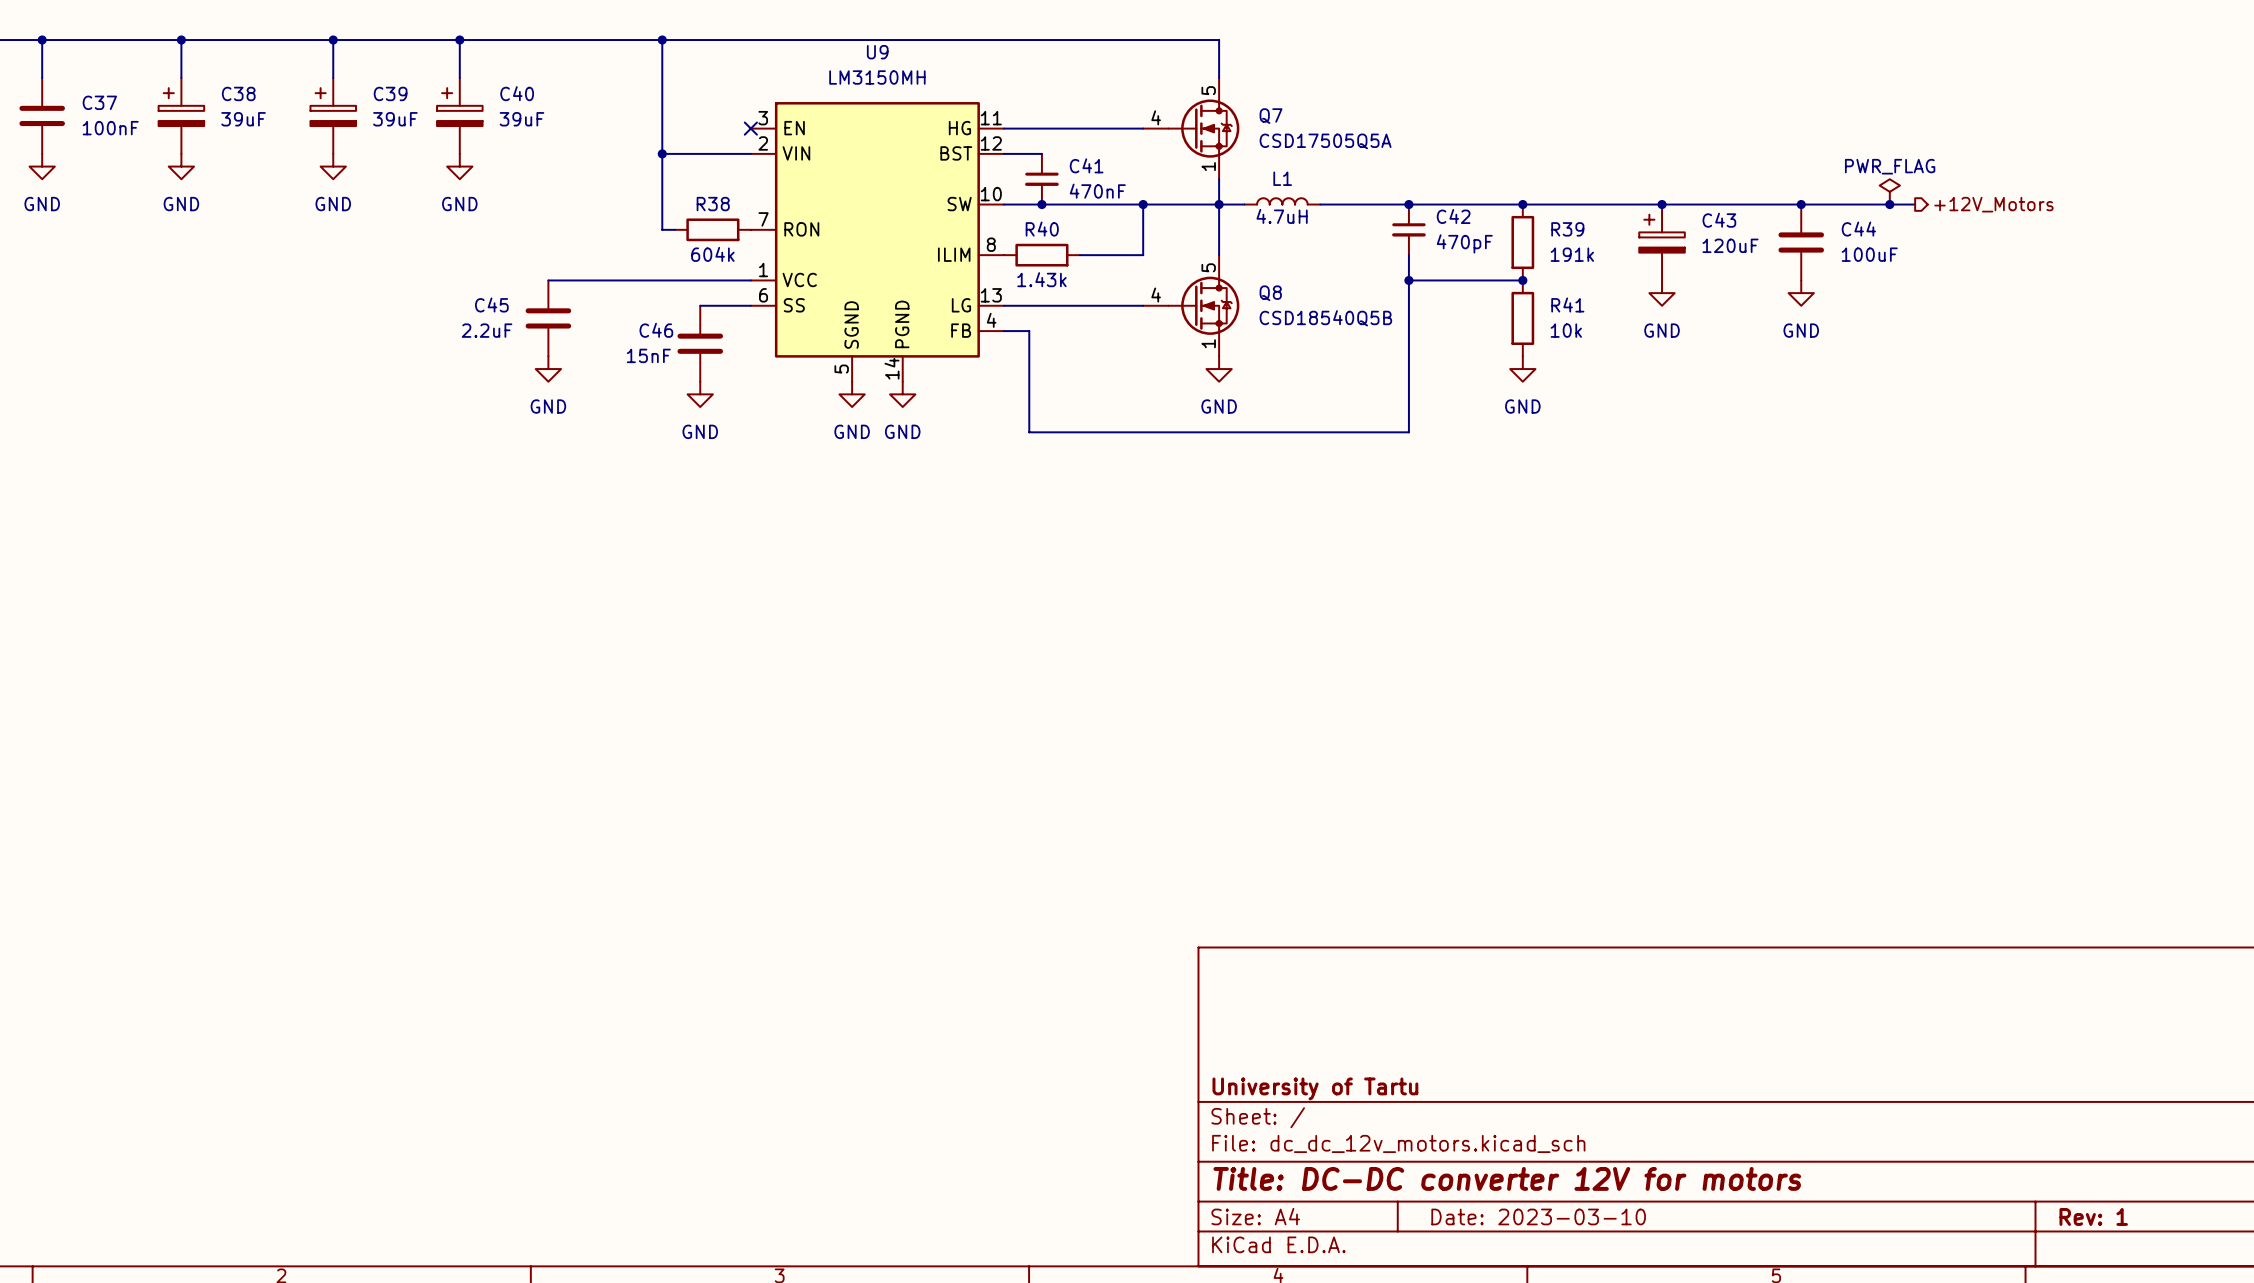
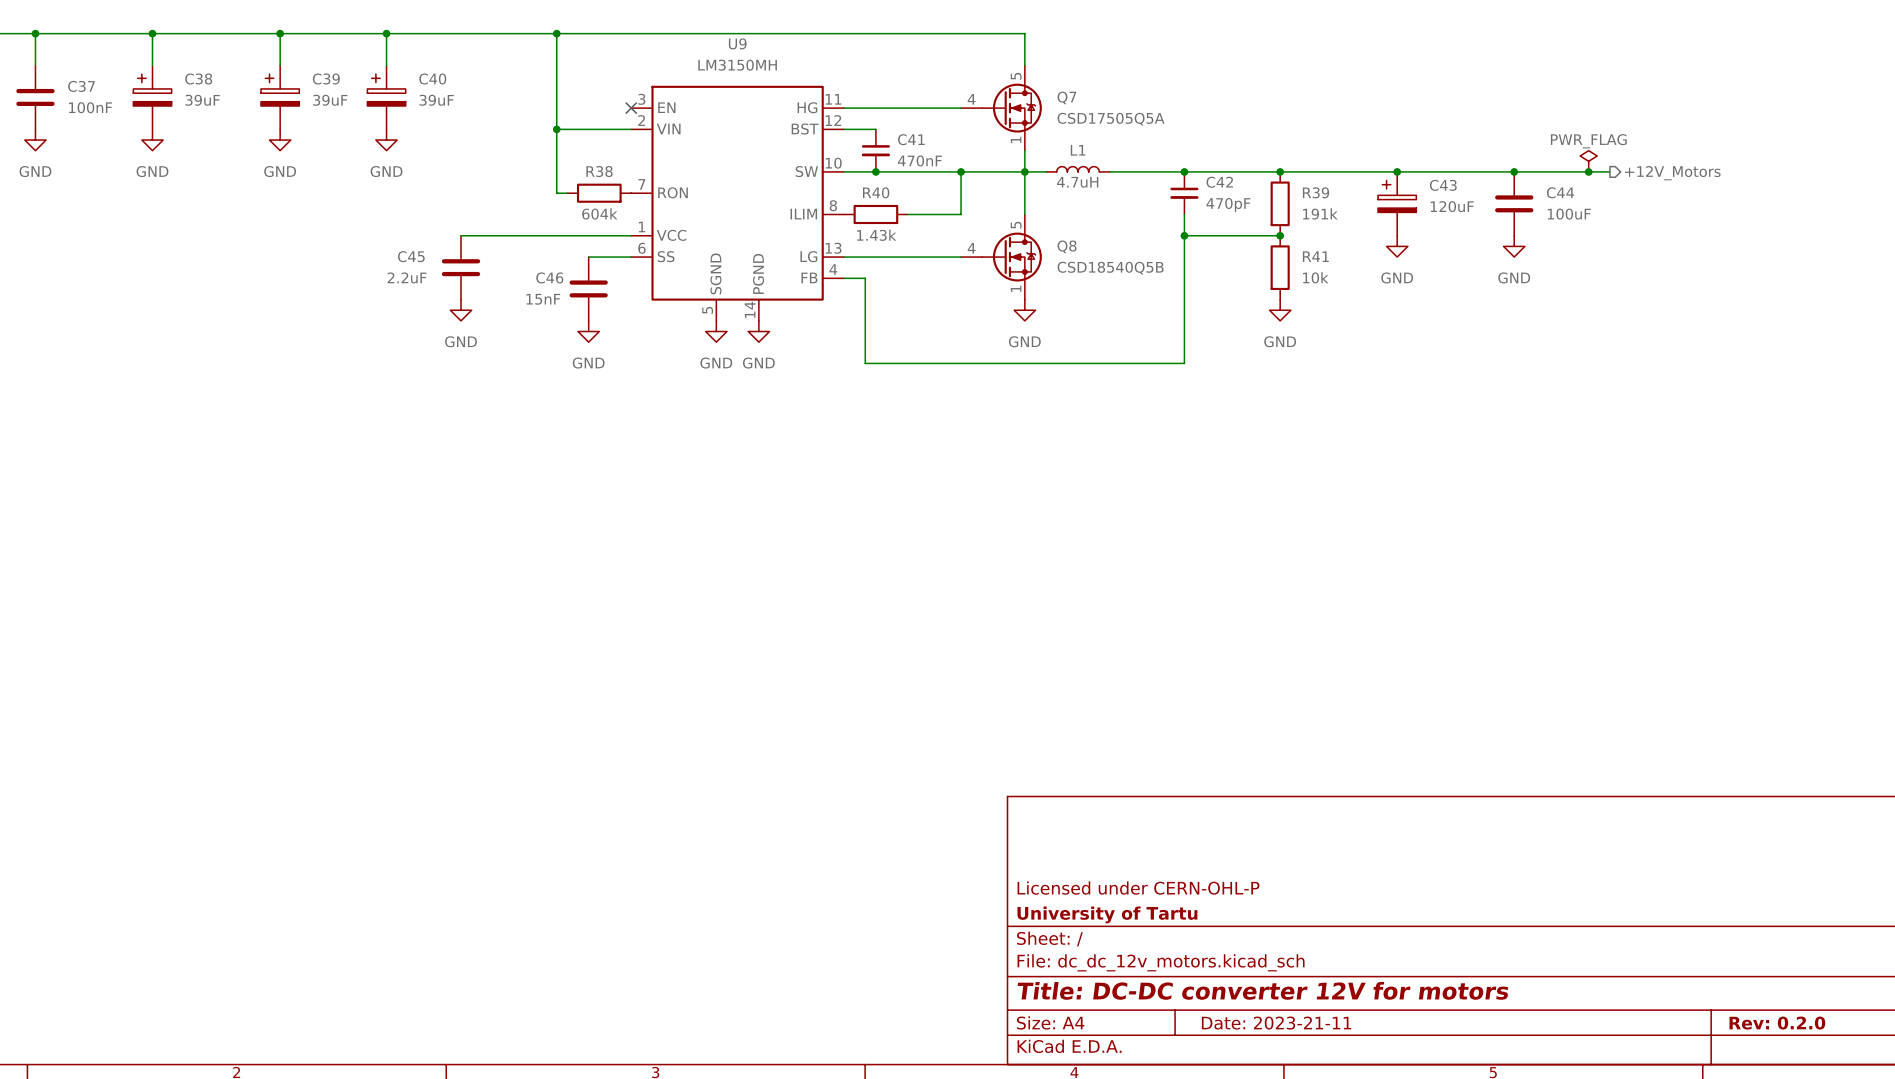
title block: none -> Licensed under CERN-OHL-P (1138, 888)
title block: Date: 2023-03-10 (1538, 1216) -> Date: 2023-21-11 (1276, 1023)
title block: Rev: 1 (2093, 1216) -> Rev: 0.2.0 (1777, 1023)

